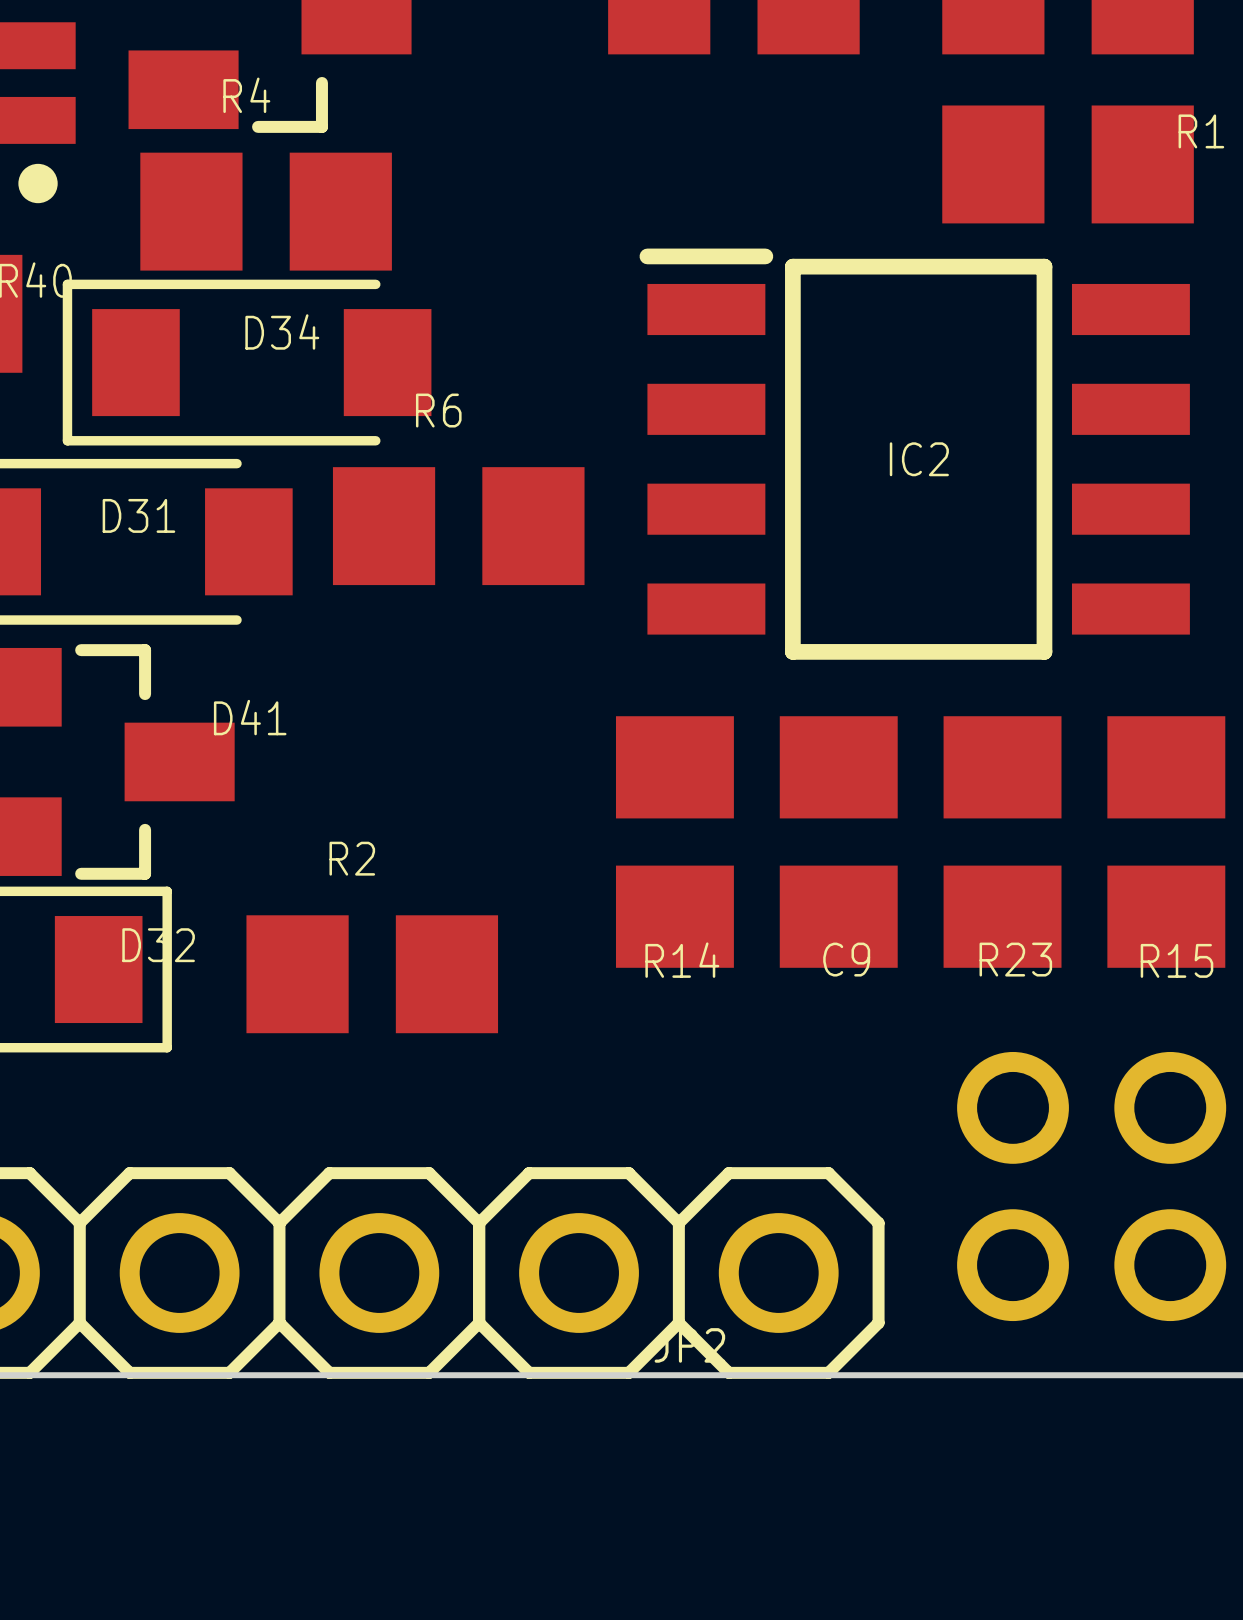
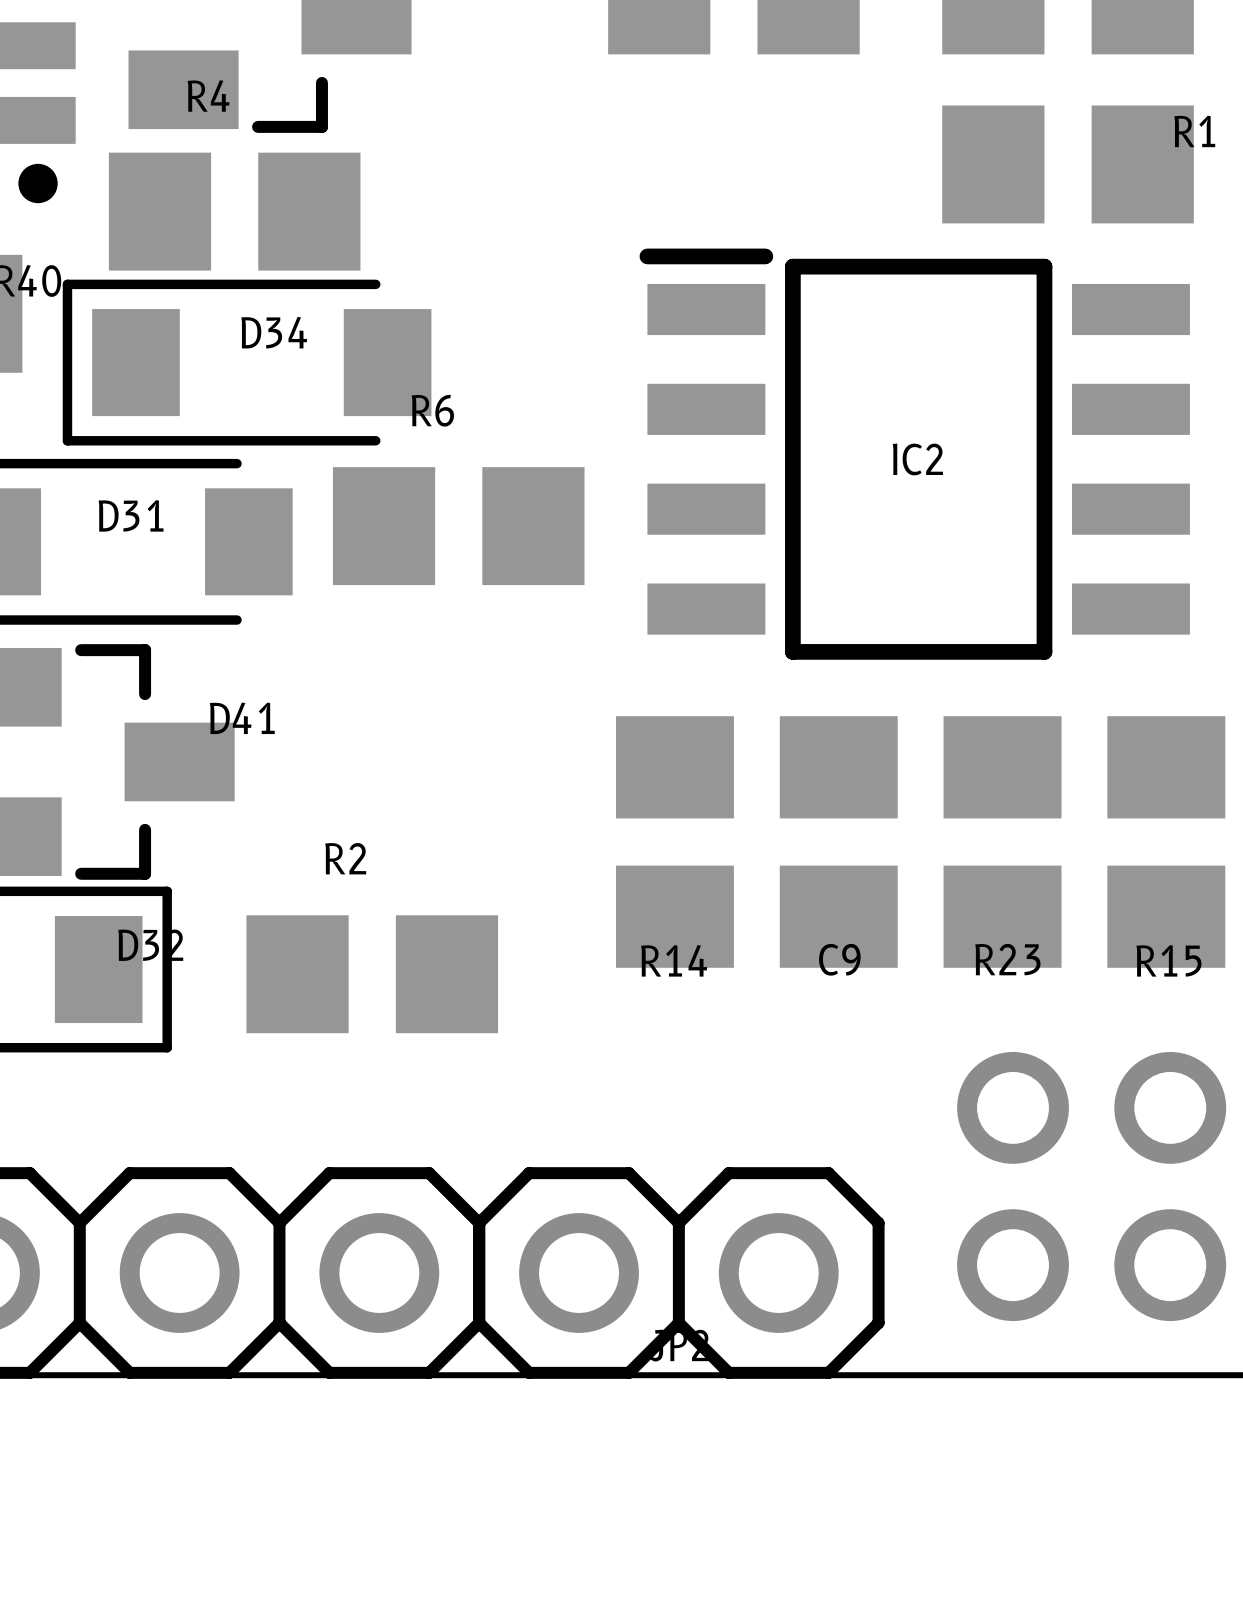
R4 position: (266, 211) -> (234, 211)

